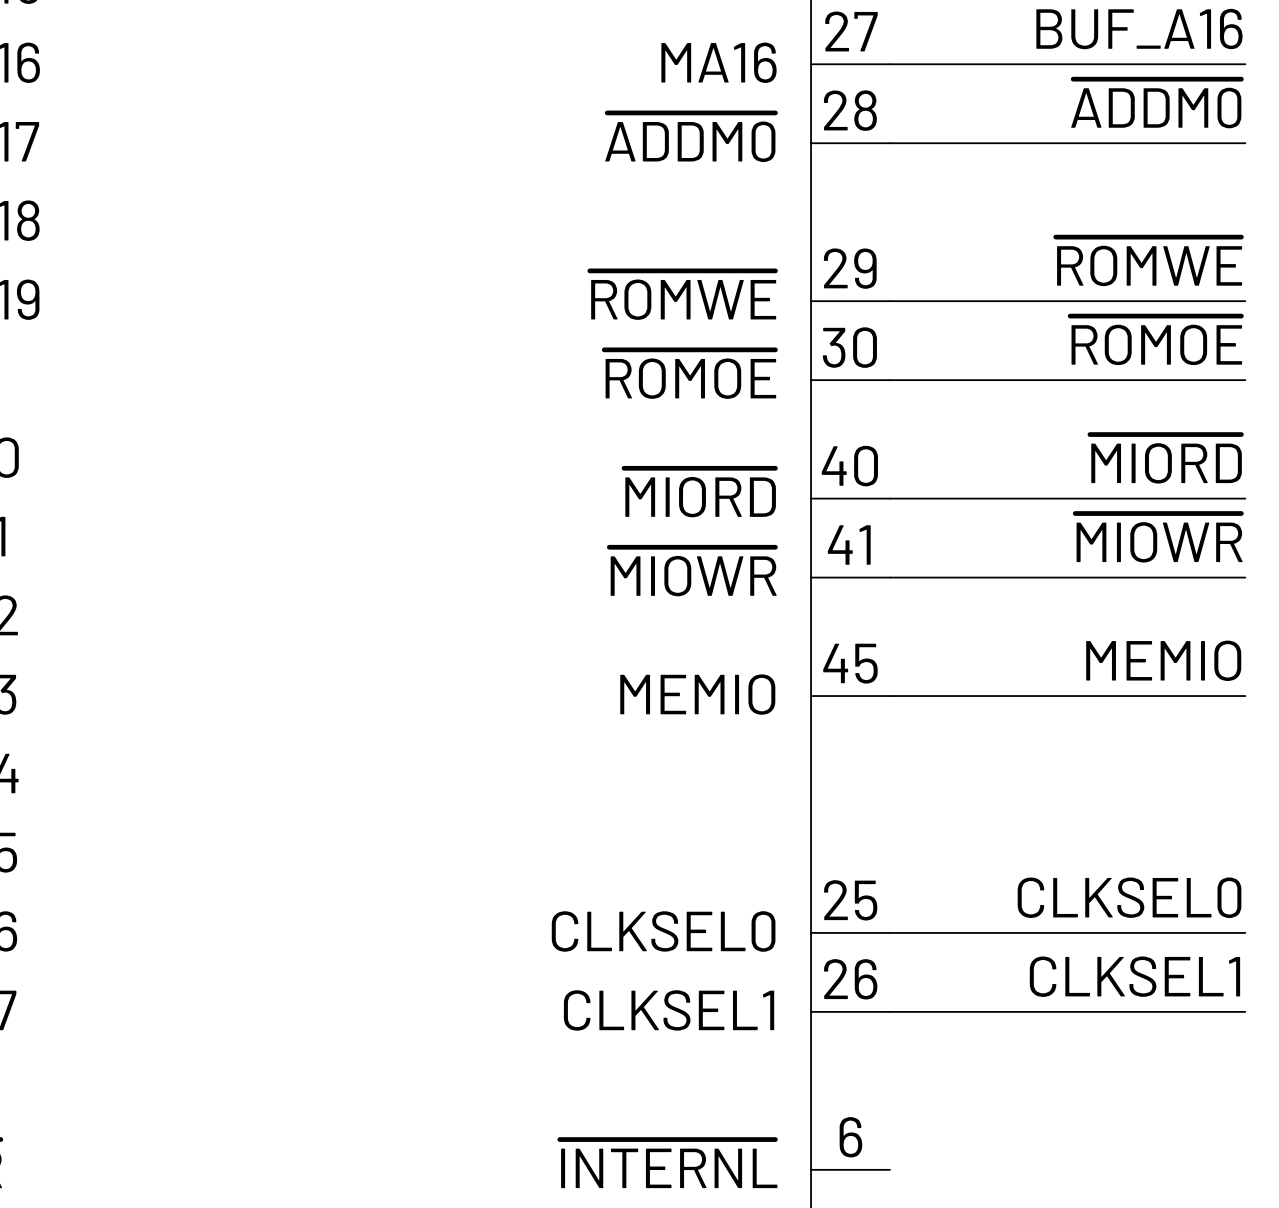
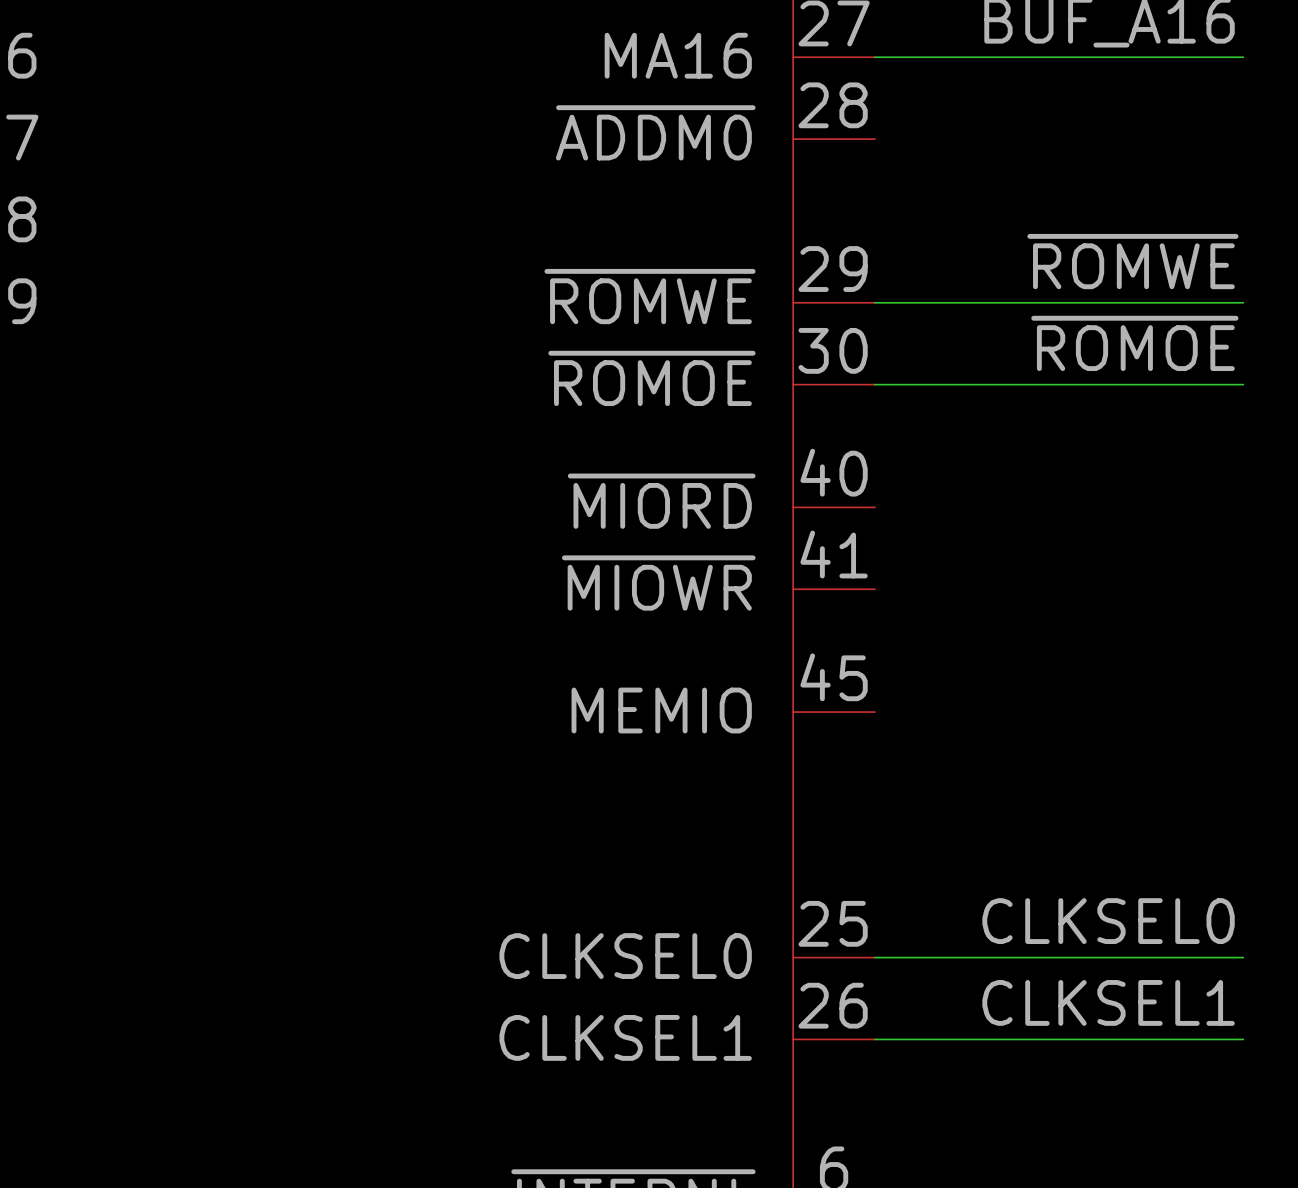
label: ~{ADDM0} (1156, 103) -> none
wire: (889, 143) (1245, 143) -> none
label: ~{MIORD} (1165, 459) -> none
wire: (889, 498) (1245, 498) -> none
label: ~{MIOWR} (1158, 538) -> none
wire: (889, 577) (1245, 577) -> none
label: MEMIO (1163, 660) -> none
wire: (889, 696) (1245, 696) -> none

